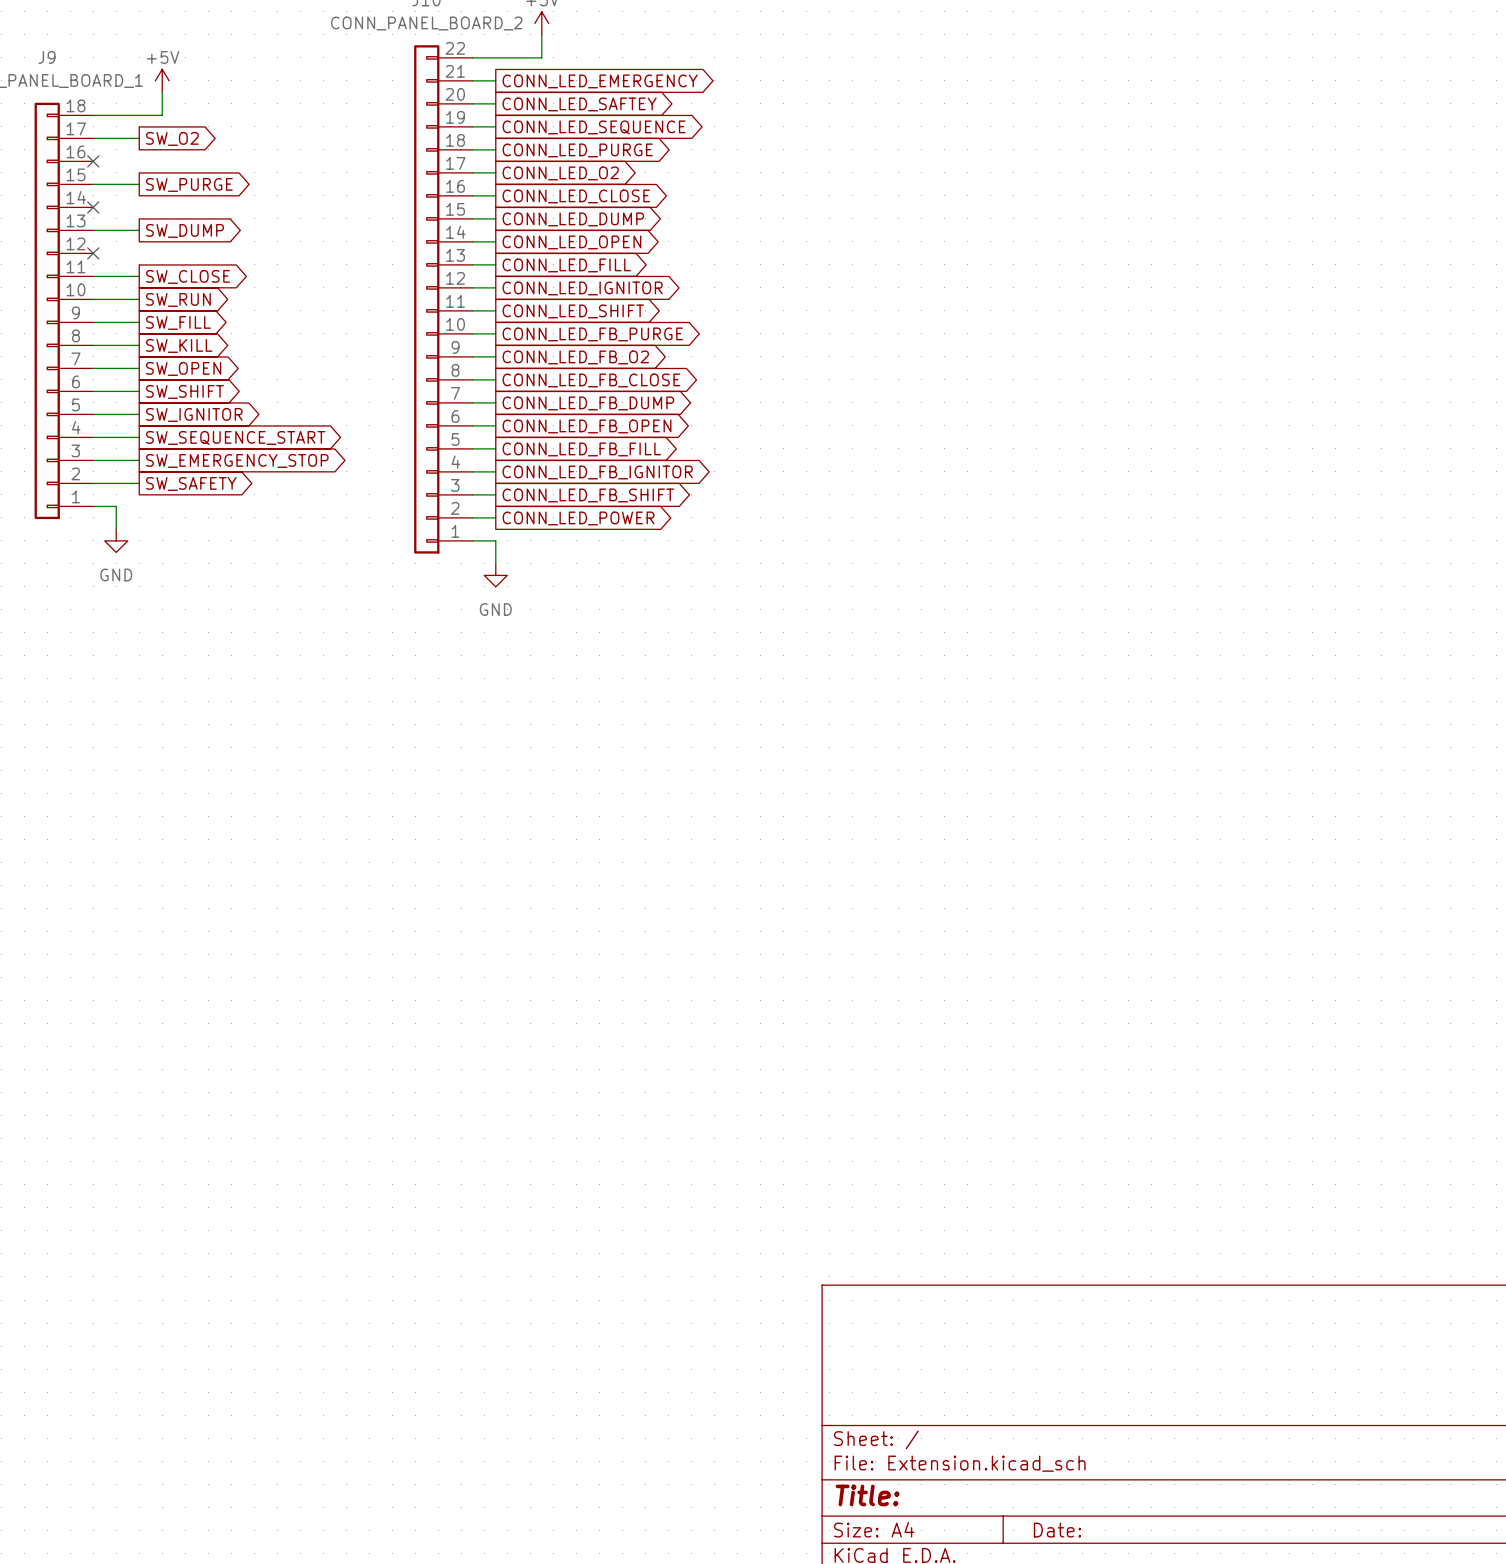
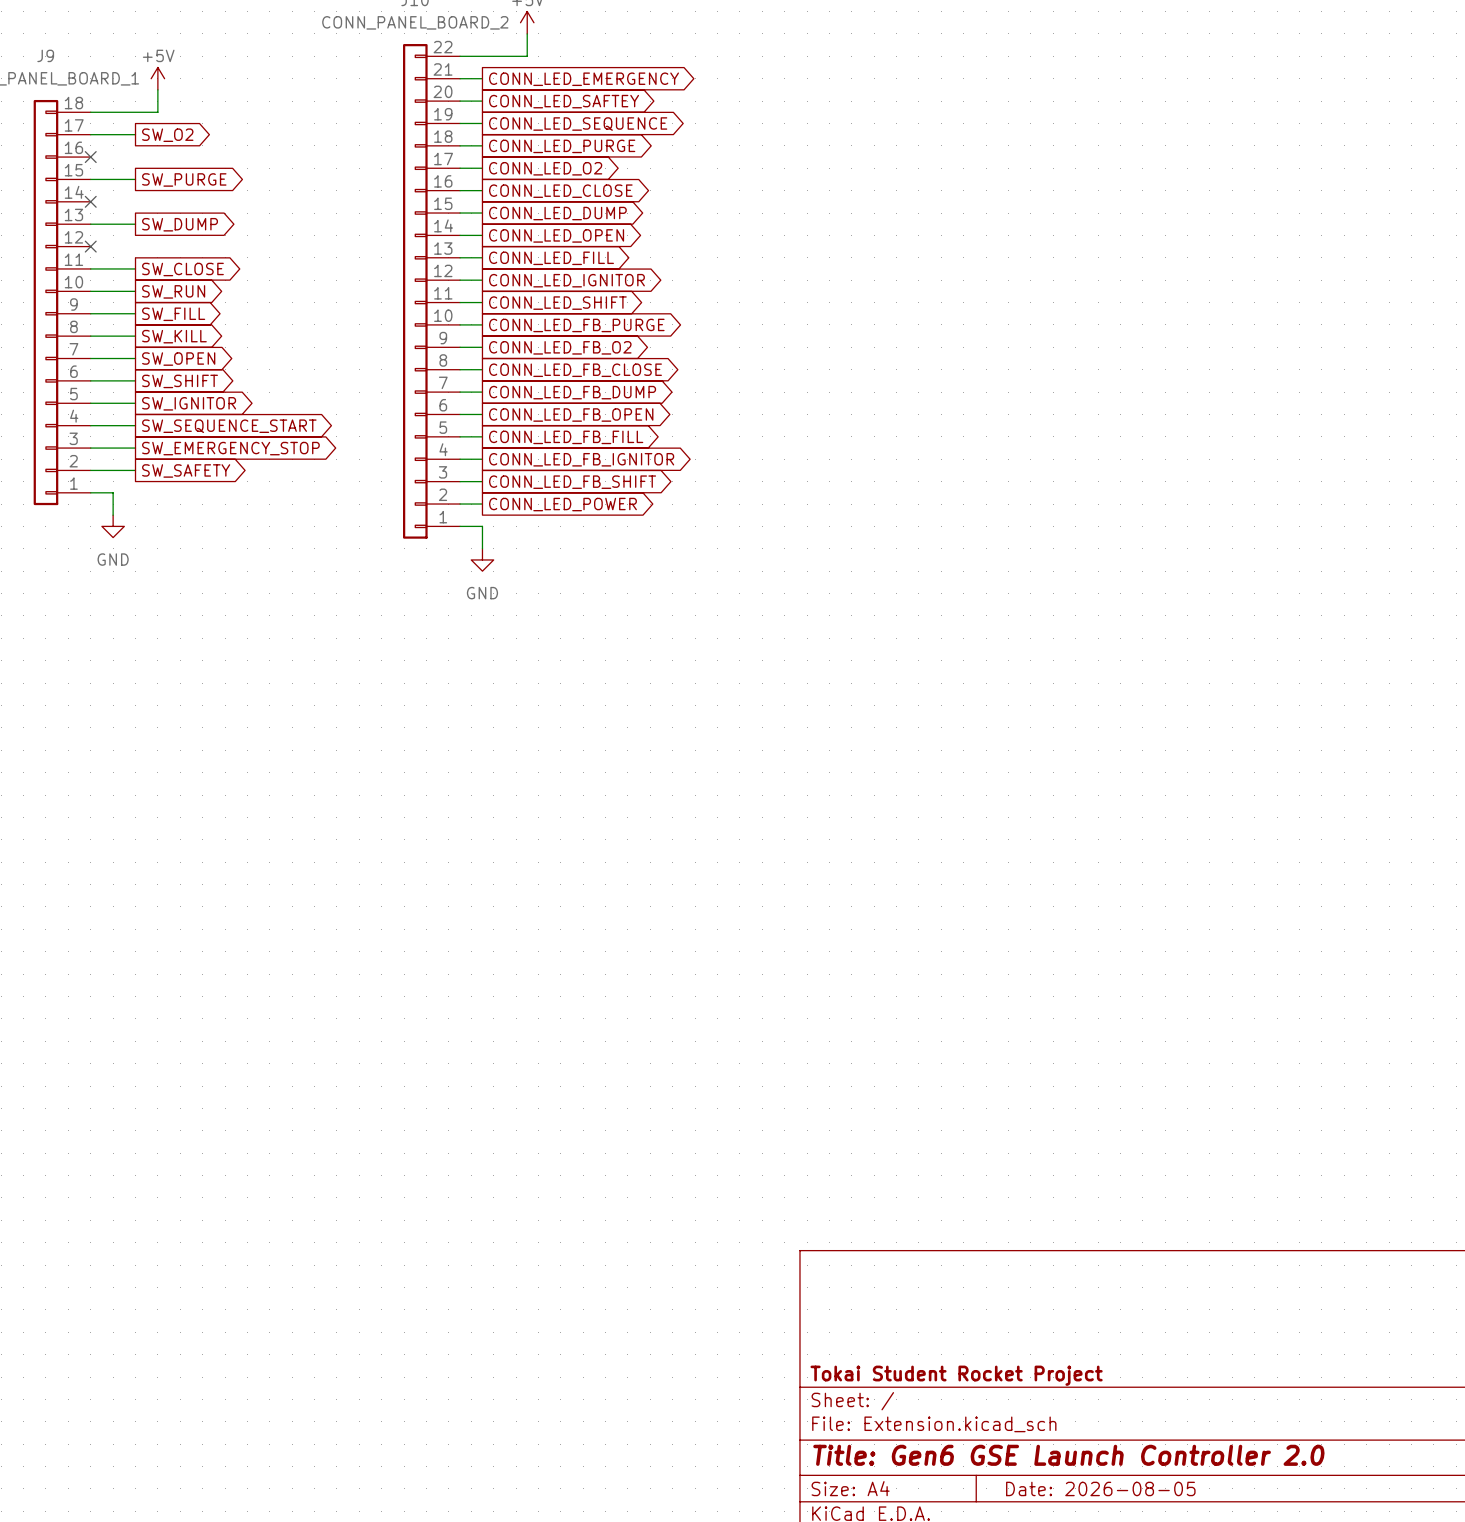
title block: none -> Tokai Student Rocket Project (956, 1375)
title block: Title: (867, 1495) -> Title: Gen6 GSE Launch Controller 2.0 (1068, 1455)
title block: Date: (1057, 1530) -> Date: 2026-08-05 (1100, 1488)

